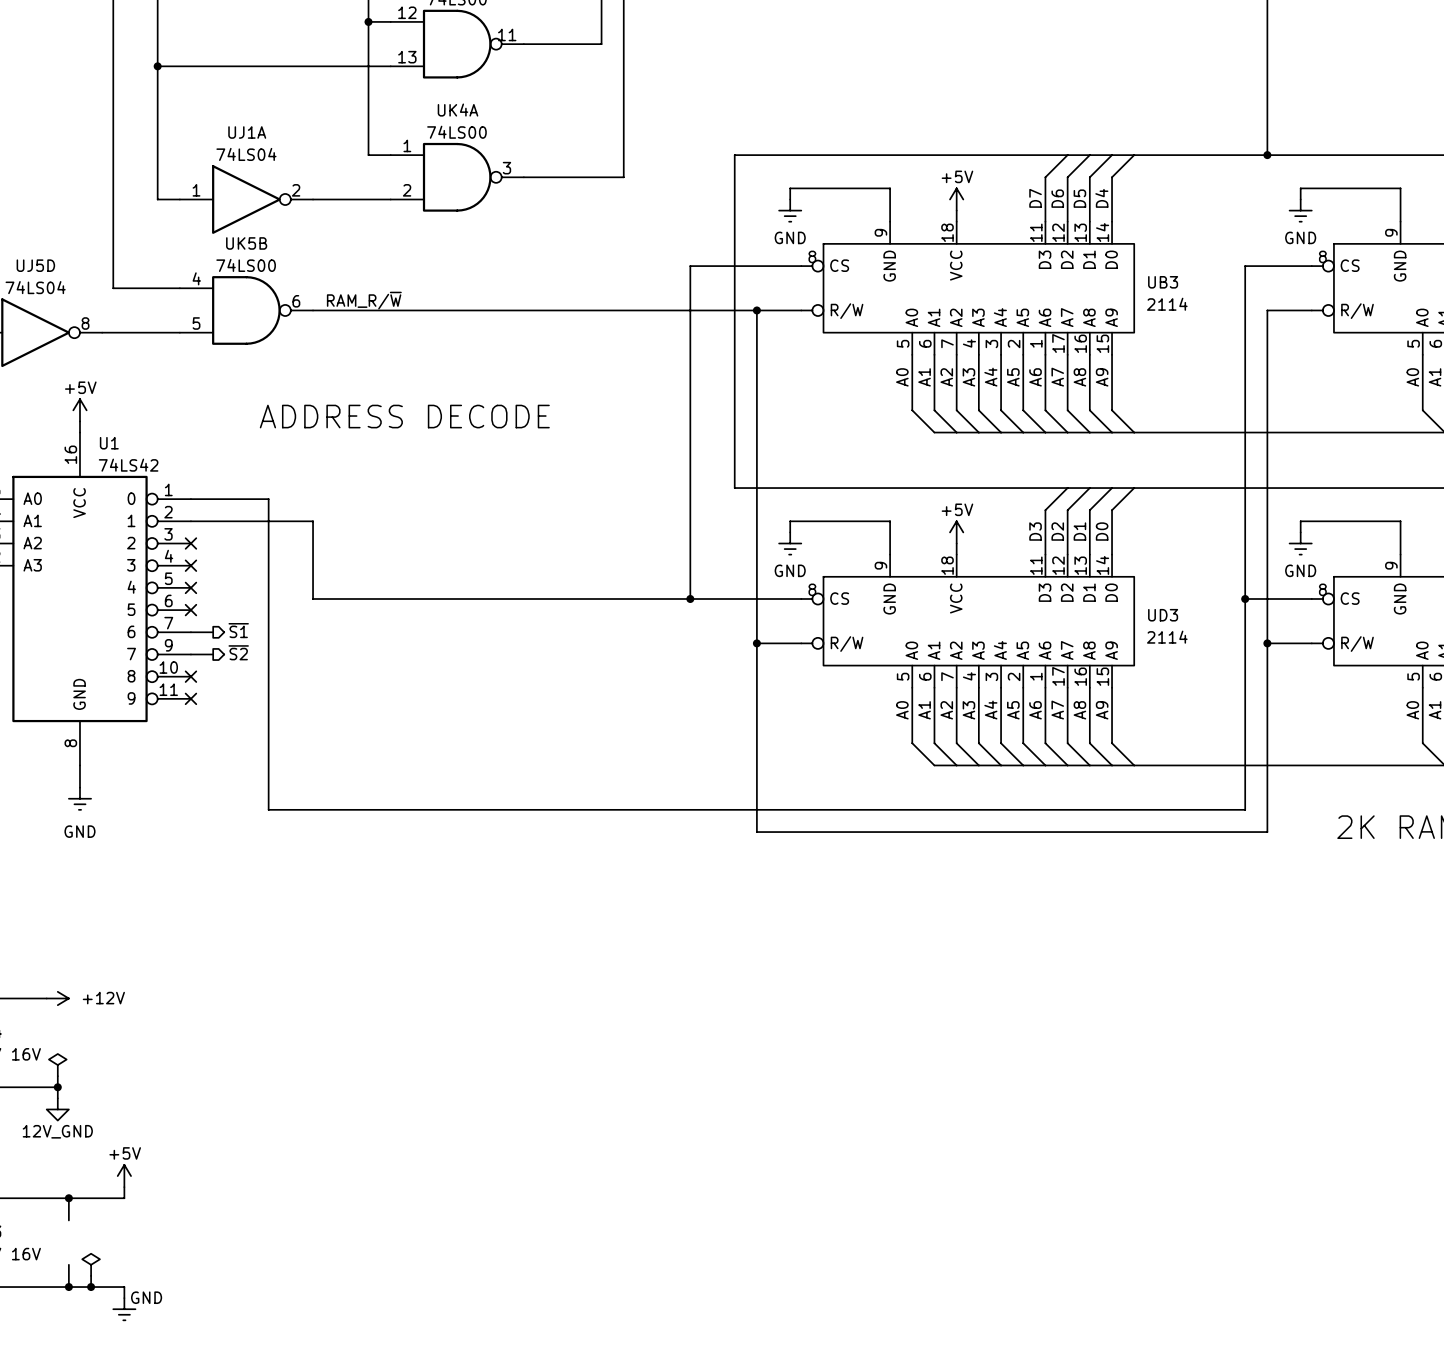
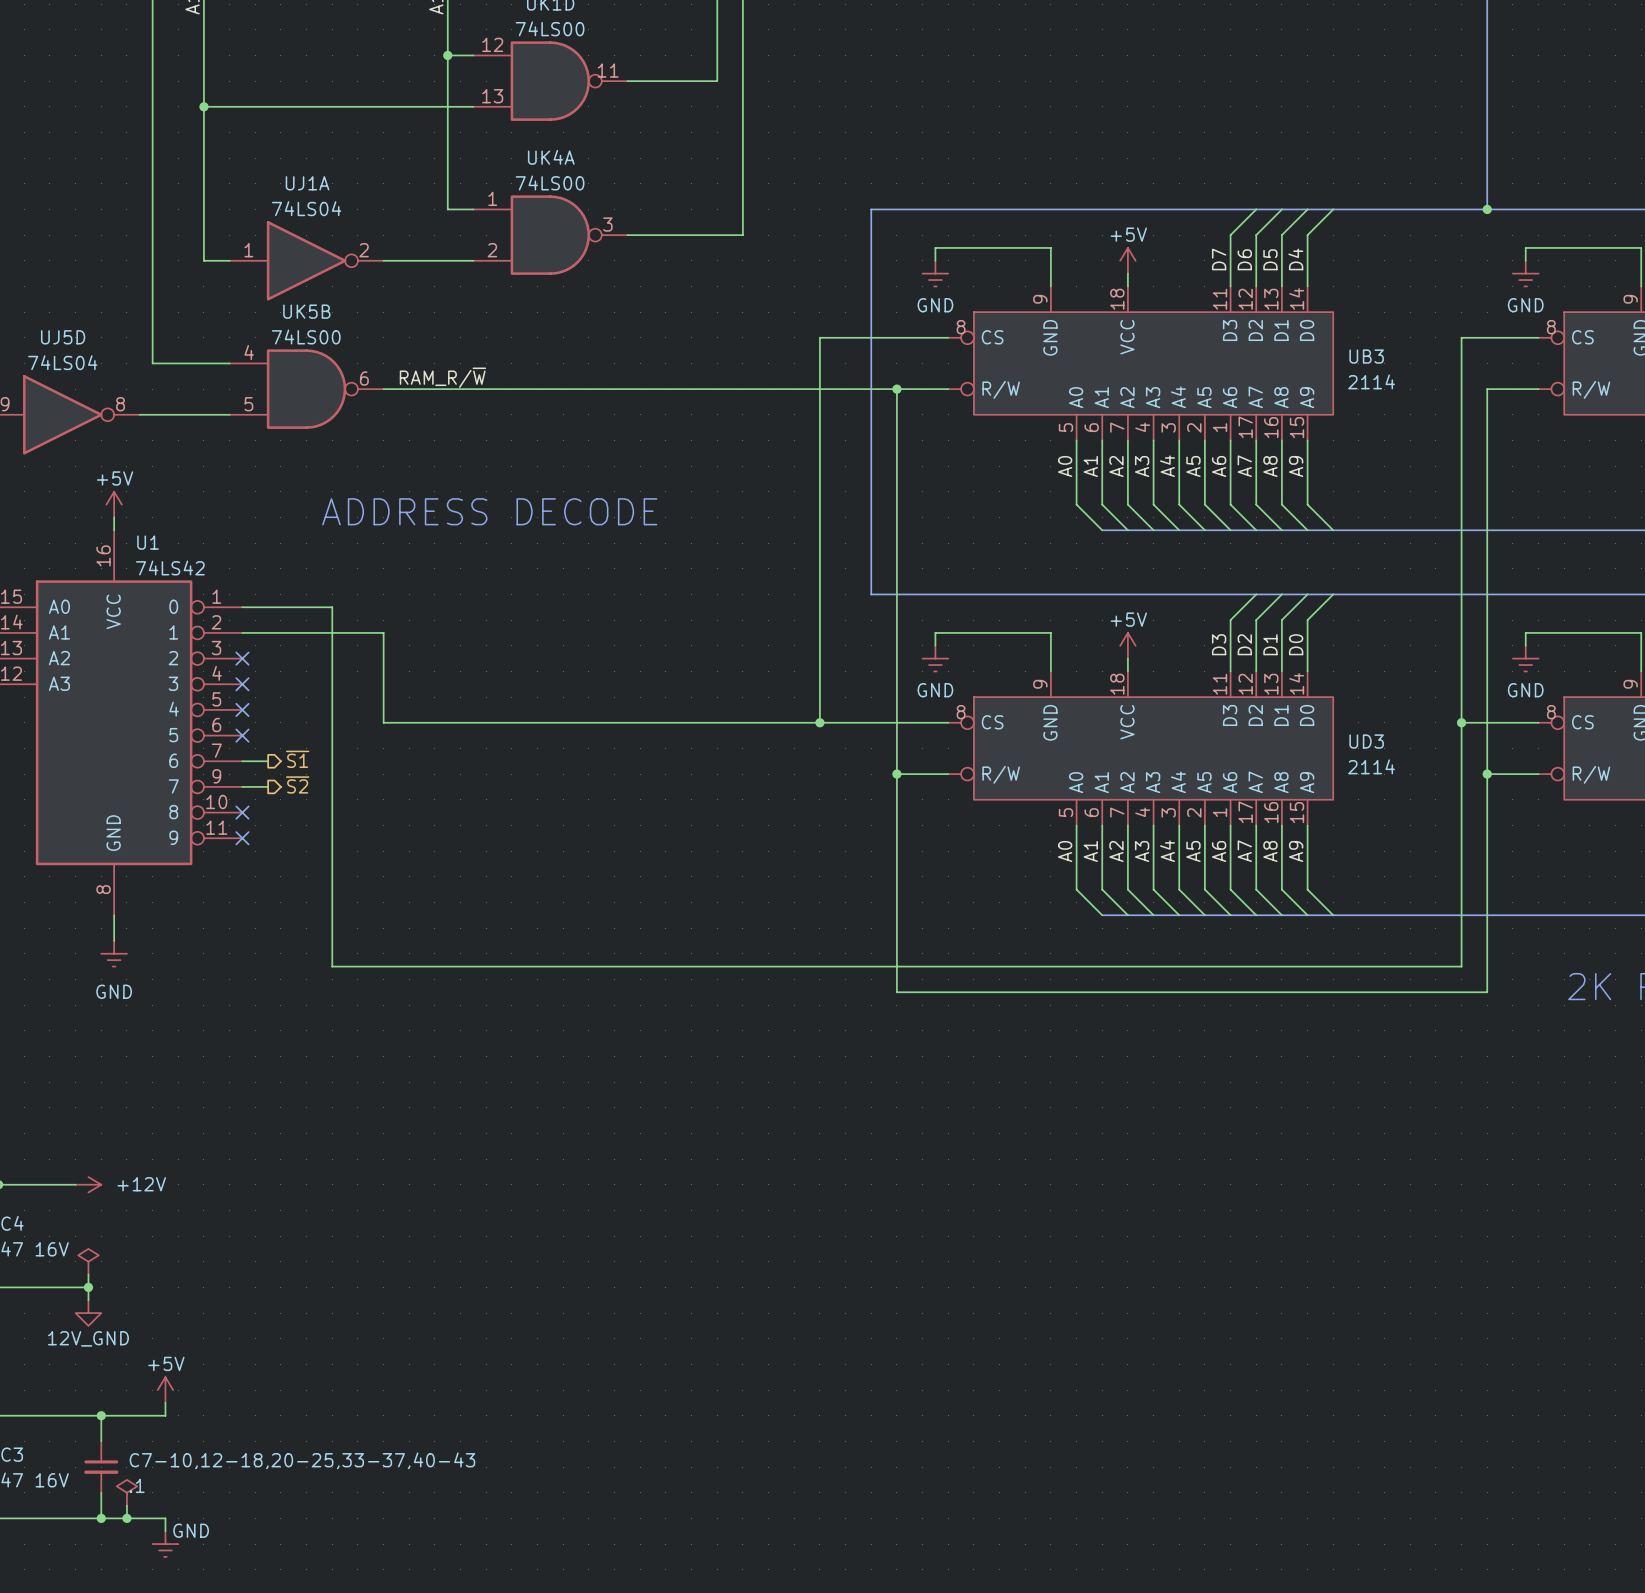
C7-10,12-18,20-25,33-37,40-43: none -> .1 (101, 1467)

